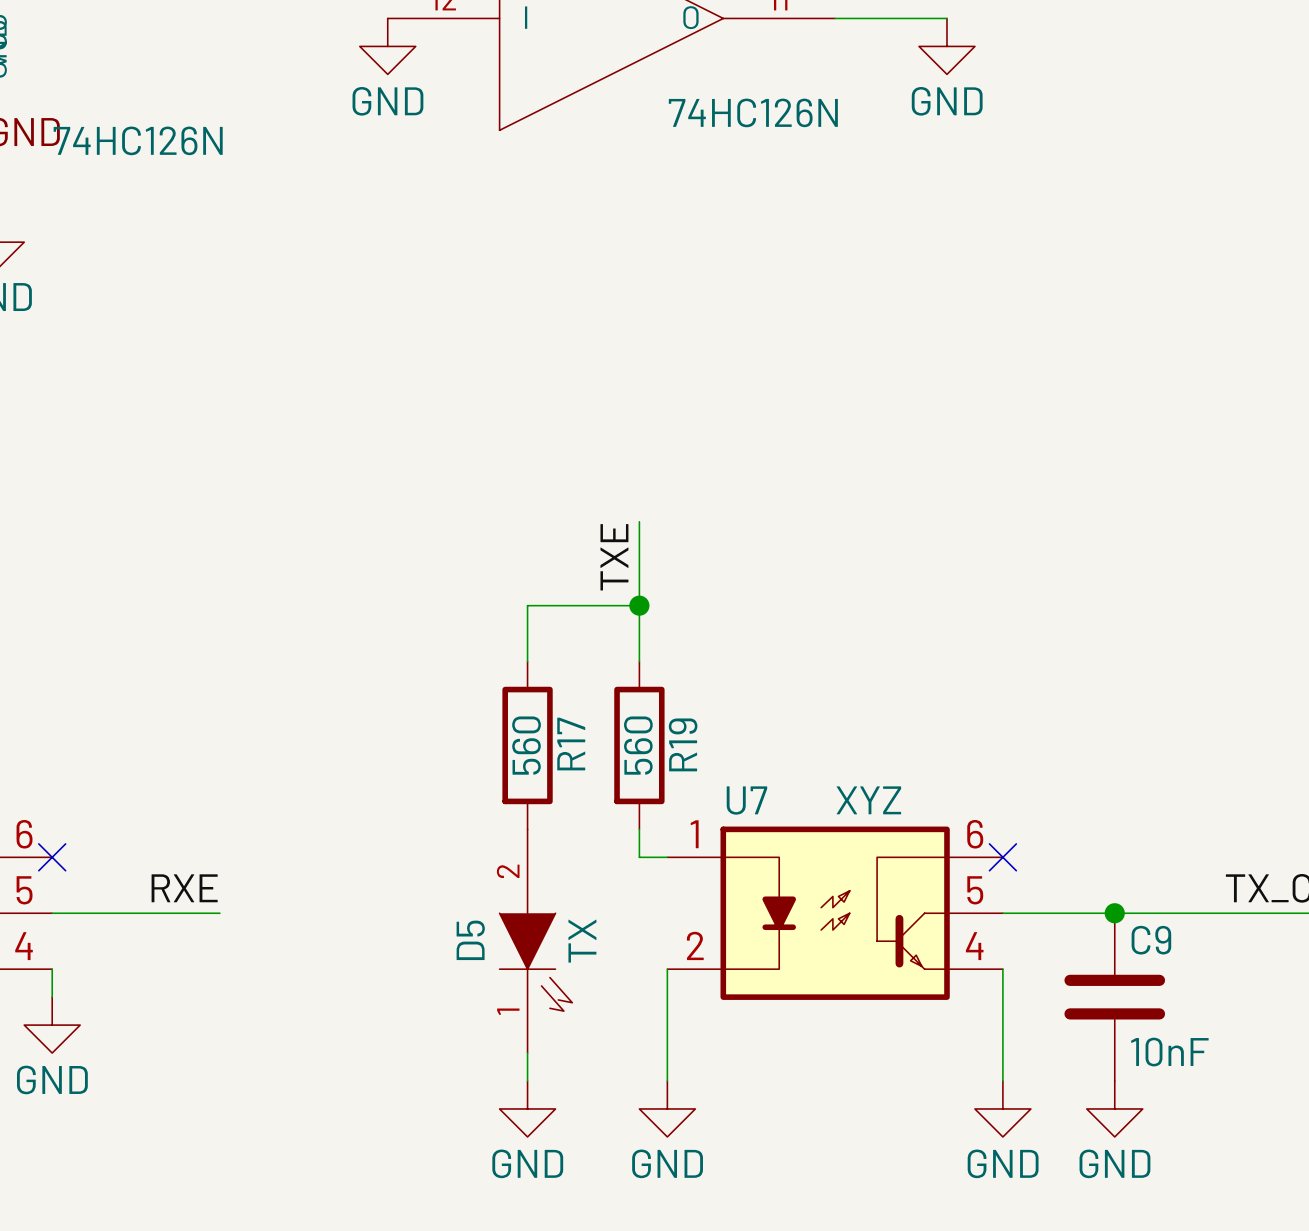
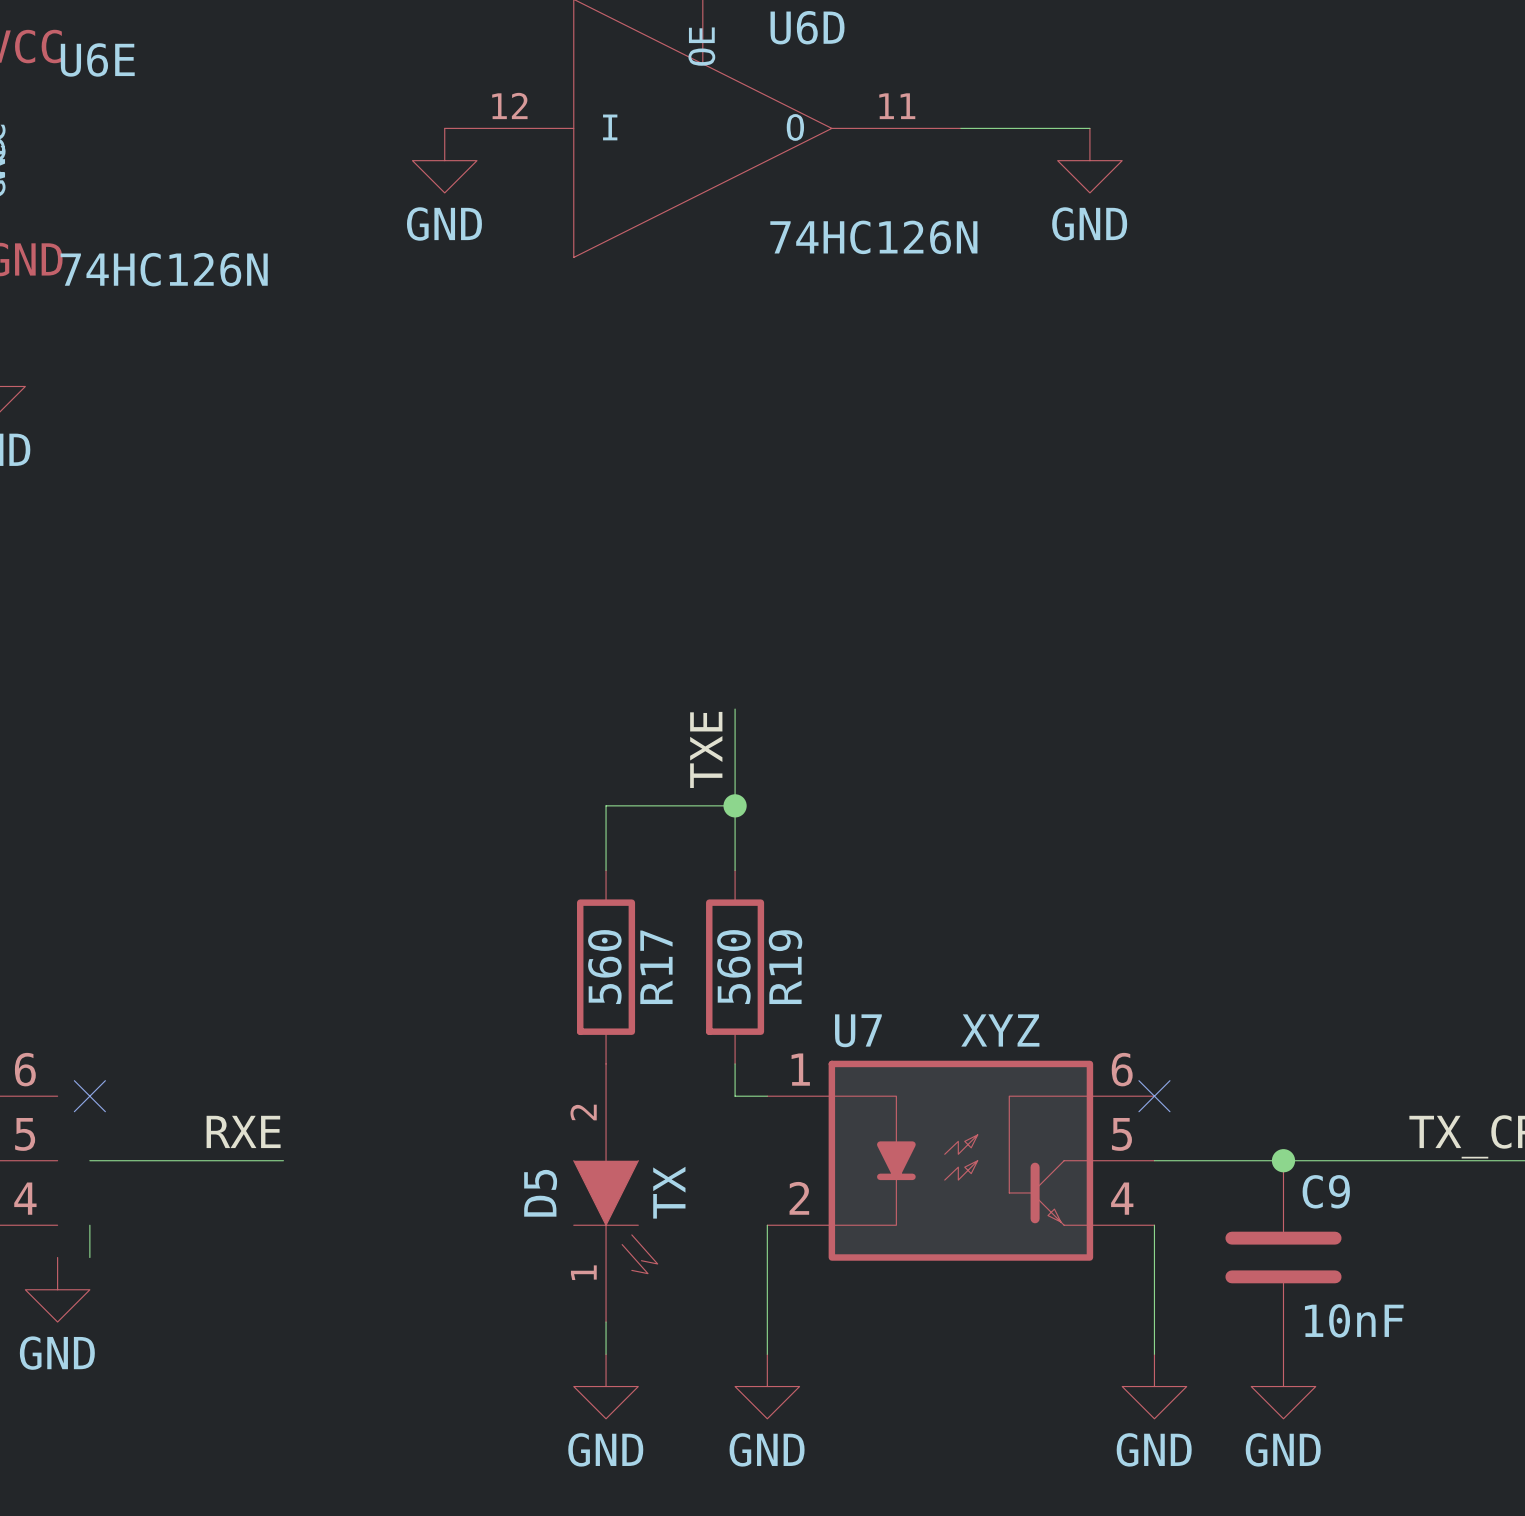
no-connect mark position: (52, 857) -> (89, 1096)
label position: RXE (184, 888) -> RXE (243, 1131)
wire: (52, 913) (80, 913) -> (251, 1160) (283, 1160)
wire: (52, 969) (52, 997) -> (89, 1225) (89, 1257)

